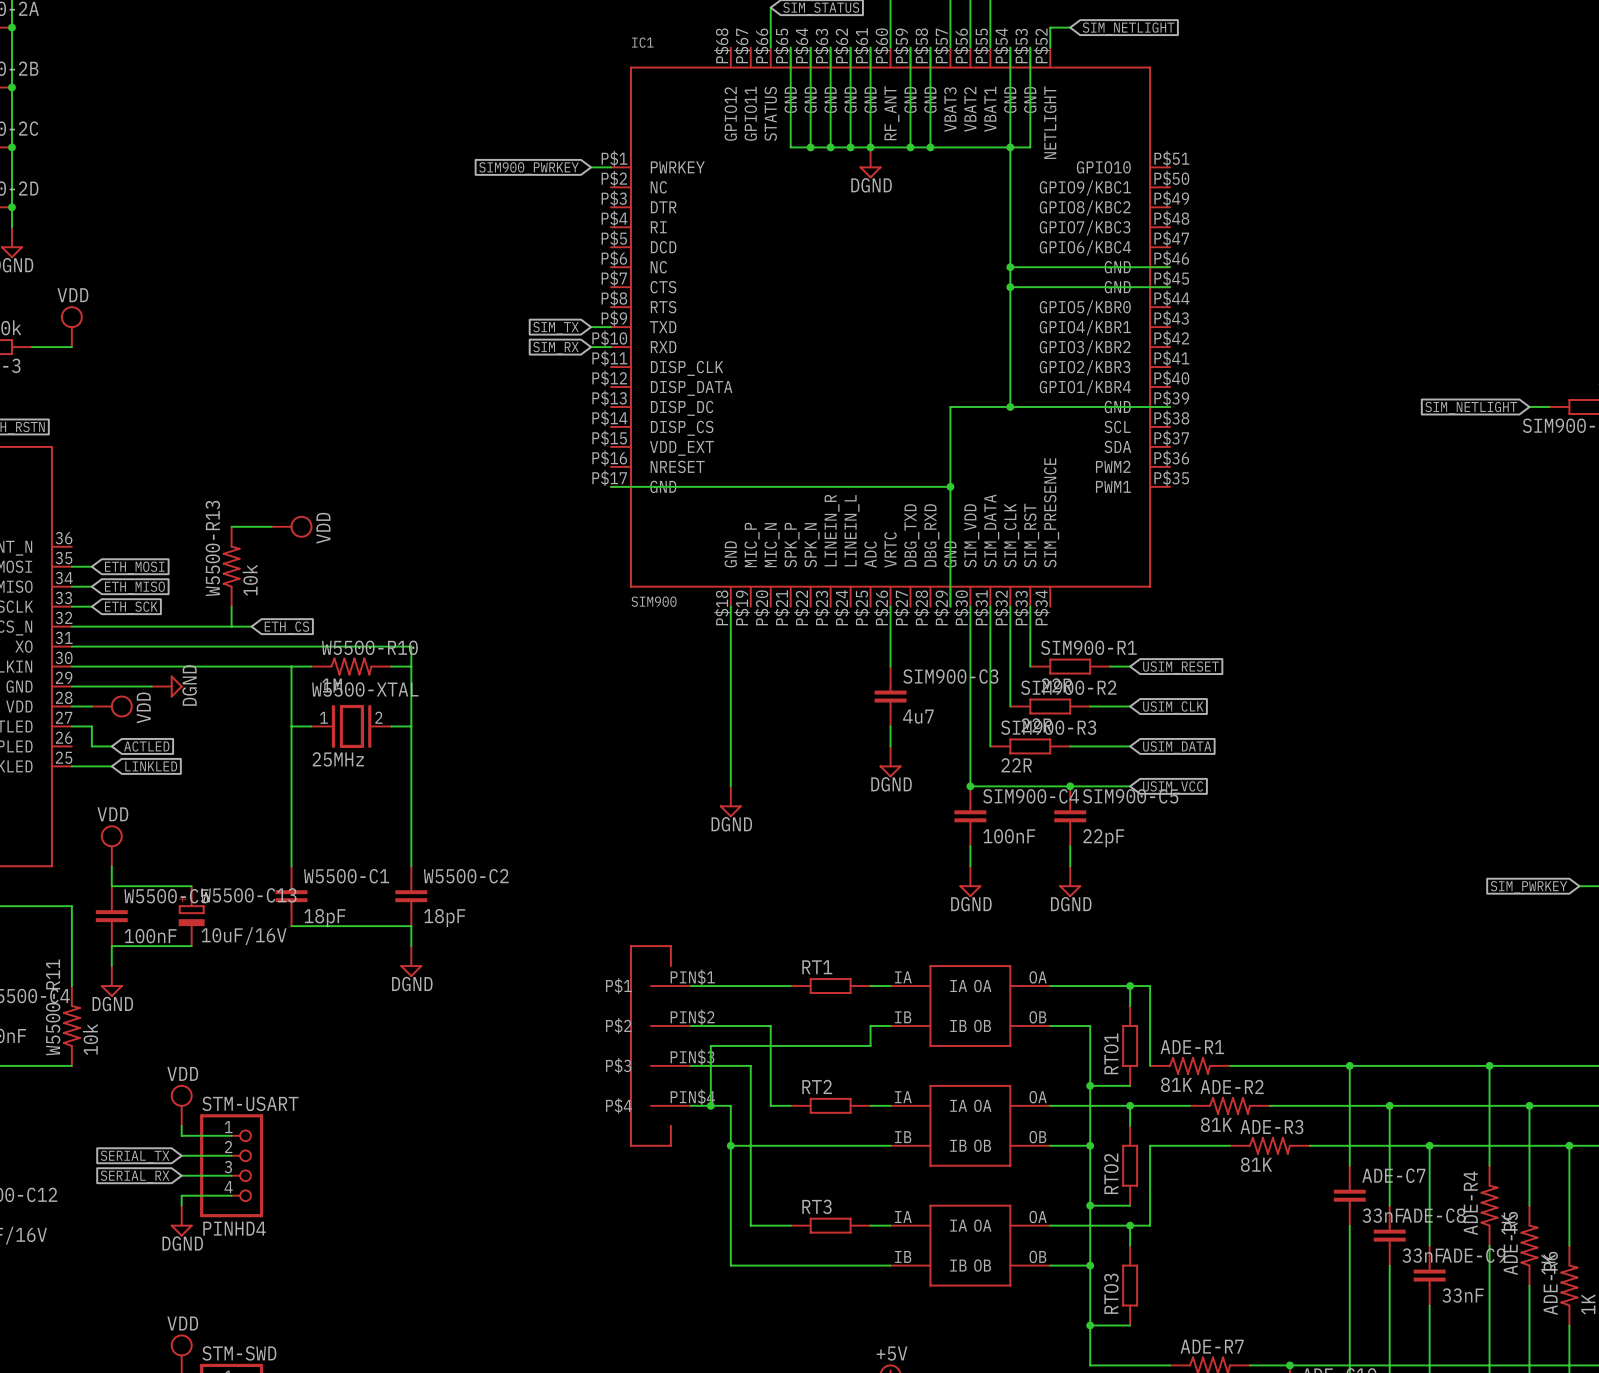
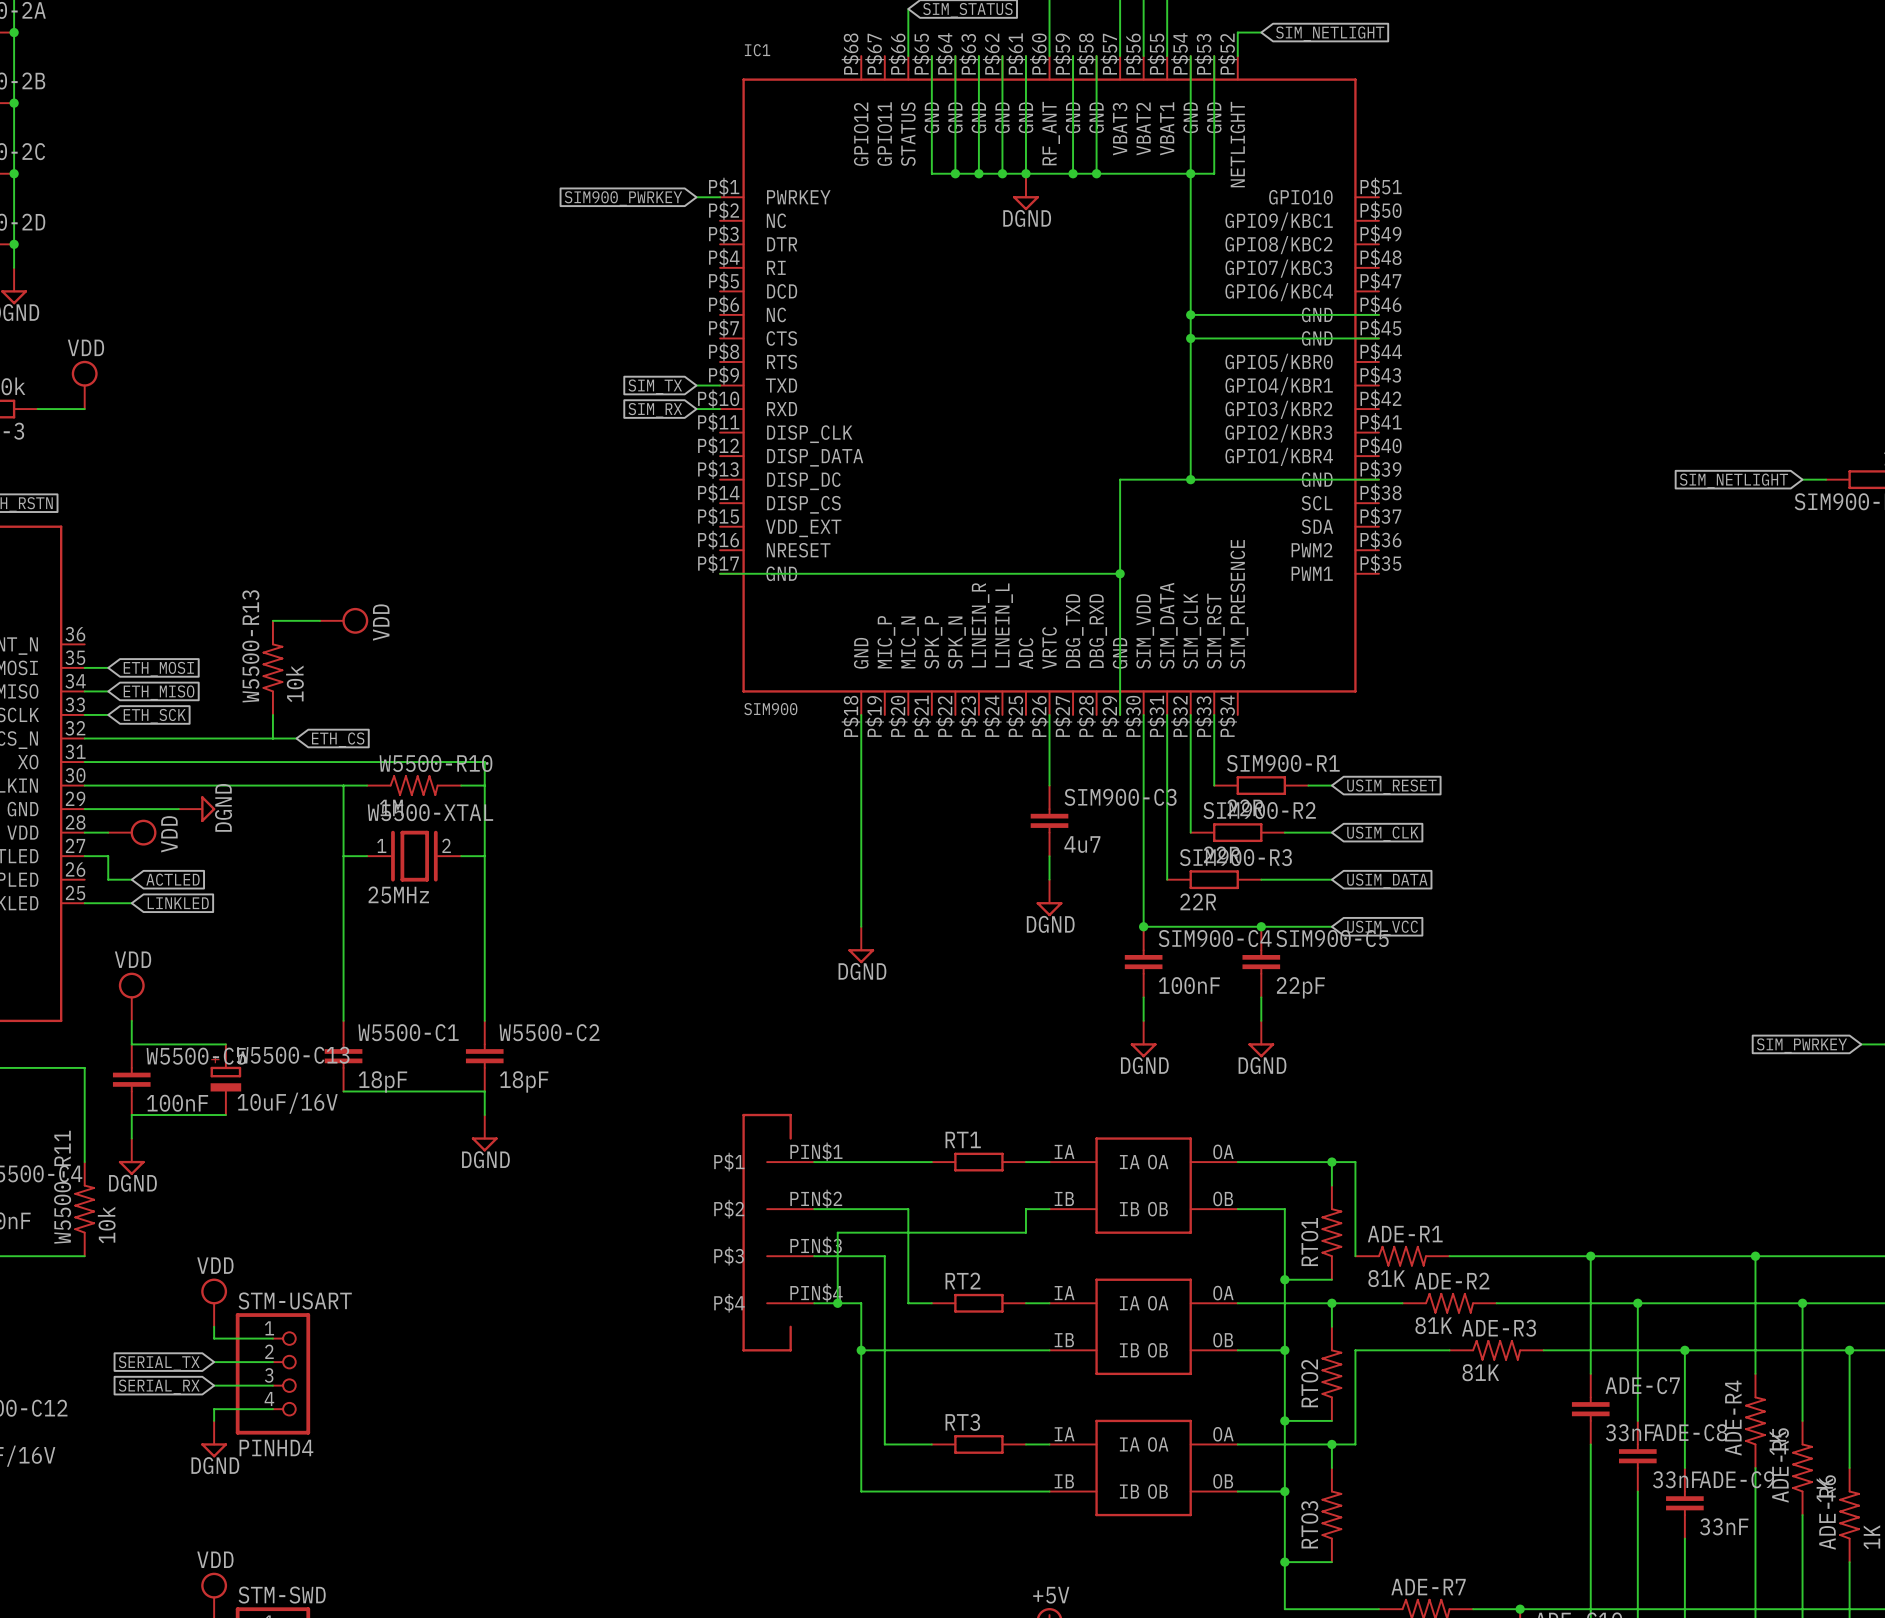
RTO1 symbol: [1122, 1006, 1139, 1086] -> [1321, 1185, 1343, 1280]
RTO2 symbol: [1122, 1125, 1139, 1206] -> [1321, 1326, 1343, 1421]
RTO3 symbol: [1122, 1245, 1139, 1326] -> [1321, 1467, 1343, 1563]

